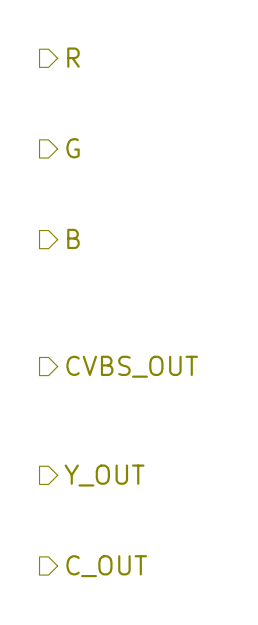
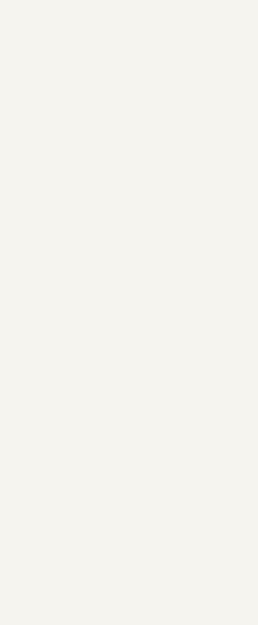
hierarchical label: R (73, 57) -> none
hierarchical label: G (73, 148) -> none
hierarchical label: B (73, 238) -> none
hierarchical label: CVBS_OUT (132, 366) -> none
hierarchical label: Y_OUT (104, 475) -> none
hierarchical label: C_OUT (106, 566) -> none

